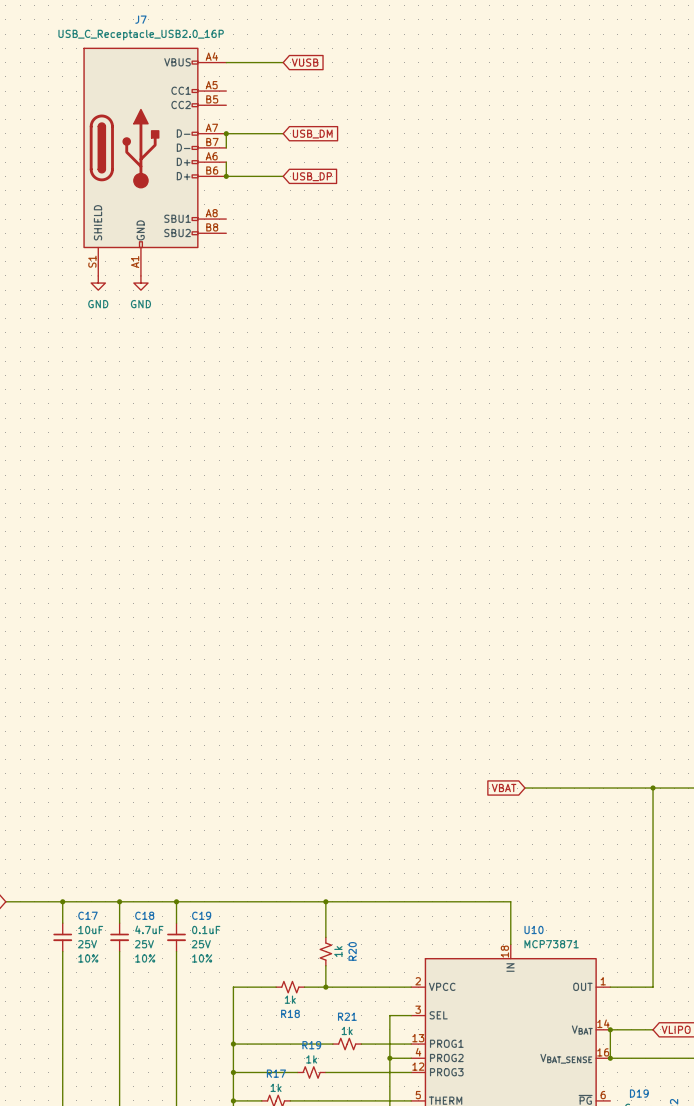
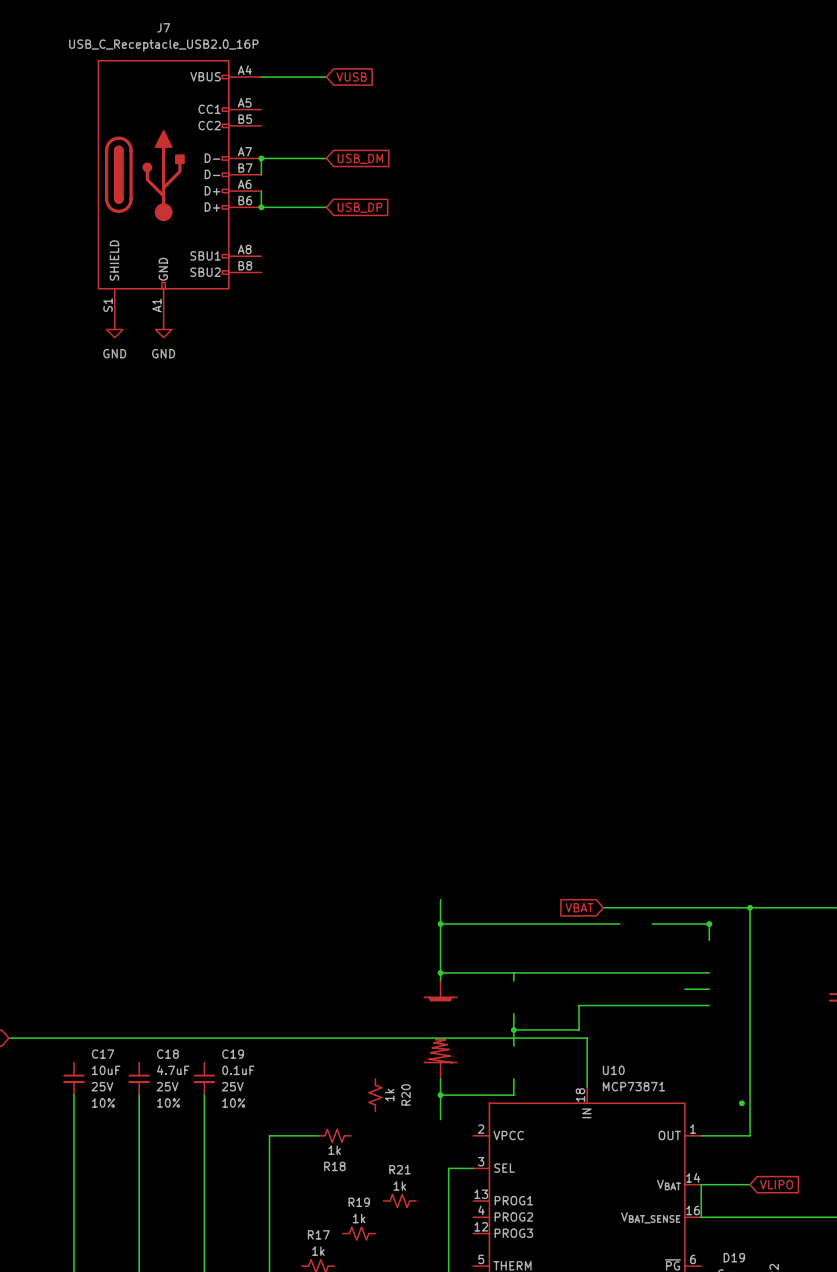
wire: none -> (440, 899) (440, 981)
wire: none -> (440, 924) (619, 924)
junction: none -> (440, 924)
wire: none -> (652, 924) (709, 924) (709, 940)
junction: none -> (709, 924)
wire: none -> (440, 972) (709, 972)
junction: none -> (440, 972)
wire: none -> (513, 972) (513, 981)
wire: none -> (684, 989) (709, 989)
part: none -> (440, 991)
wire: none -> (709, 1005) (579, 1005) (579, 1029) (513, 1029)
wire: none -> (513, 1013) (513, 1046)
junction: none -> (513, 1029)
wire: (62, 901) (62, 923) -> none
junction: (62, 901) -> none
wire: (119, 901) (119, 923) -> none
junction: (119, 901) -> none
wire: (176, 901) (176, 923) -> none
junction: (176, 901) -> none
wire: (325, 901) (325, 937) -> (440, 1078) (440, 1119)
junction: (325, 901) -> none
part: none -> (440, 1058)
wire: none -> (513, 1078) (513, 1095) (440, 1095)
junction: none -> (440, 1095)
junction: none -> (741, 1103)
wire: (325, 965) (325, 987) -> none
wire: (304, 987) (411, 987) -> none
junction: (325, 987) -> none
junction: (610, 1029) -> none
wire: (233, 1044) (332, 1044) -> none
junction: (233, 1044) -> none
wire: (361, 1044) (411, 1044) -> none
wire: (389, 1058) (411, 1058) -> none
junction: (389, 1058) -> none
junction: (610, 1058) -> none
wire: (233, 1072) (297, 1072) -> none
junction: (233, 1072) -> none
wire: (325, 1072) (411, 1072) -> none
wire: (233, 1100) (261, 1100) -> none
junction: (233, 1100) -> none
wire: (290, 1100) (411, 1100) -> none

